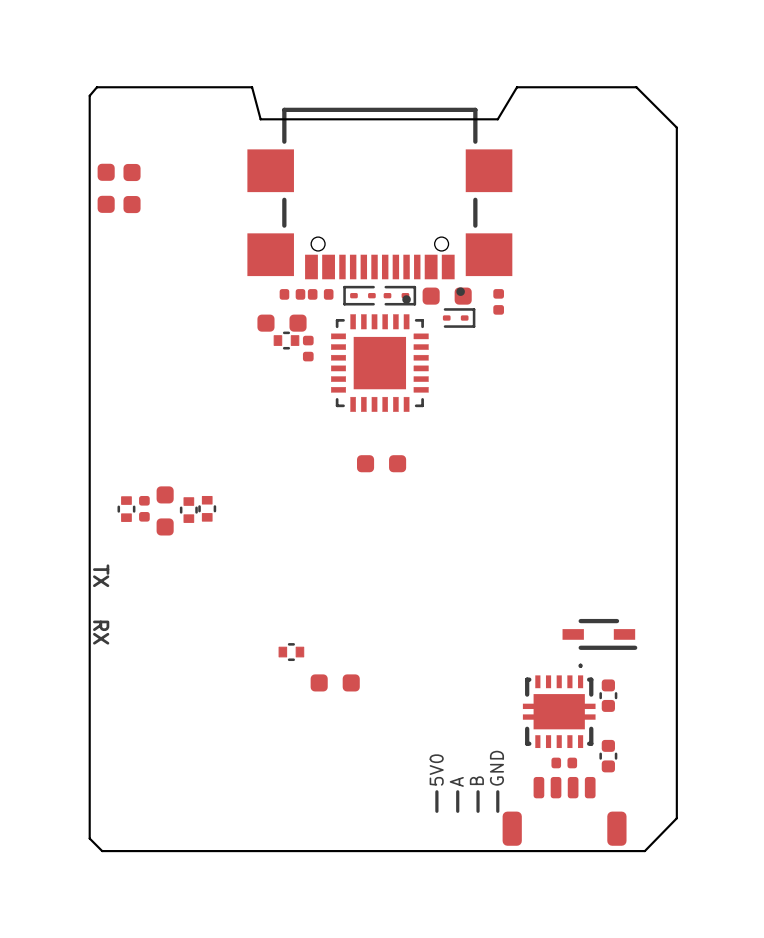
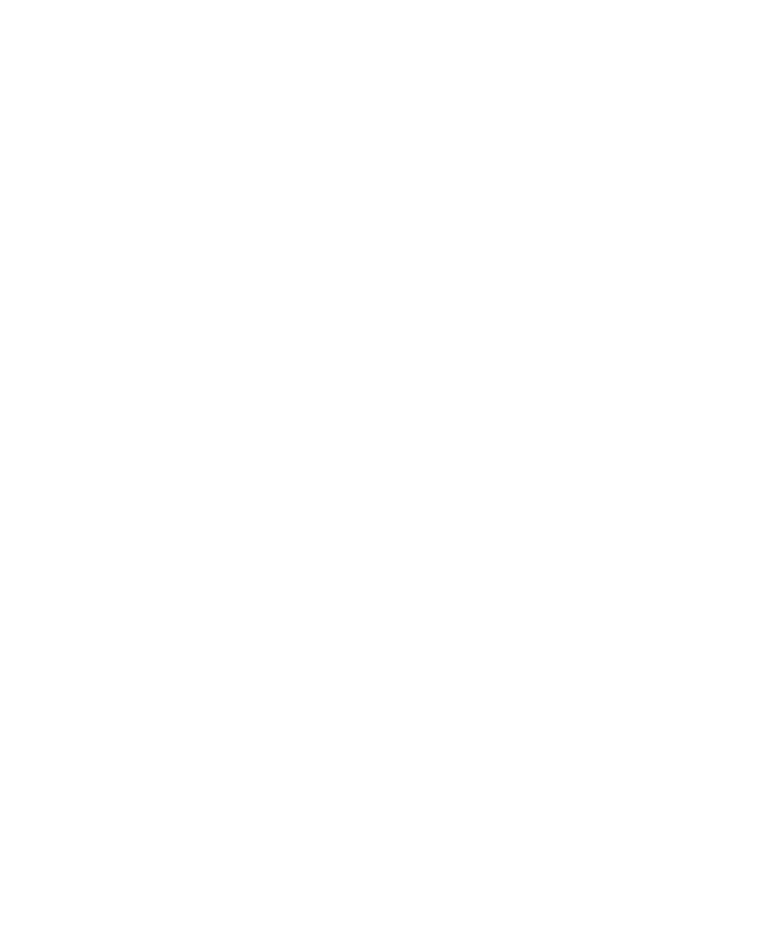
board edge: (96, 87) (252, 87) (260, 119) (497, 119) (517, 87) (636, 87) (676, 127) (676, 818) (644, 851) (102, 851) (89, 838) (89, 95) (96, 87) -> none
part: (106, 188) -> none
part: (132, 188) -> none
part: (379, 201) -> none
part: (292, 294) -> none
part: (320, 294) -> none
part: (359, 295) -> none
part: (399, 295) -> none
part: (447, 296) -> none
part: (498, 301) -> none
part: (459, 318) -> none
part: (282, 323) -> none
part: (286, 340) -> none
part: (308, 348) -> none
part: (379, 353) -> none
part: (381, 463) -> none
part: (144, 508) -> none
part: (207, 508) -> none
part: (126, 509) -> none
part: (165, 510) -> none
part: (188, 510) -> none
text: TX (101, 575) -> none
text: RX (101, 632) -> none
part: (599, 634) -> none
part: (291, 652) -> none
part: (335, 682) -> none
part: (608, 695) -> none
part: (559, 705) -> none
part: (608, 756) -> none
part: (564, 762) -> none
text: GND (496, 768) -> none
text: 5V0 (436, 770) -> none
text: B (476, 780) -> none
text: A (456, 781) -> none
line: (436, 791) (436, 811) -> none
line: (457, 791) (457, 811) -> none
line: (478, 791) (478, 811) -> none
line: (497, 791) (497, 811) -> none
part: (564, 811) -> none

